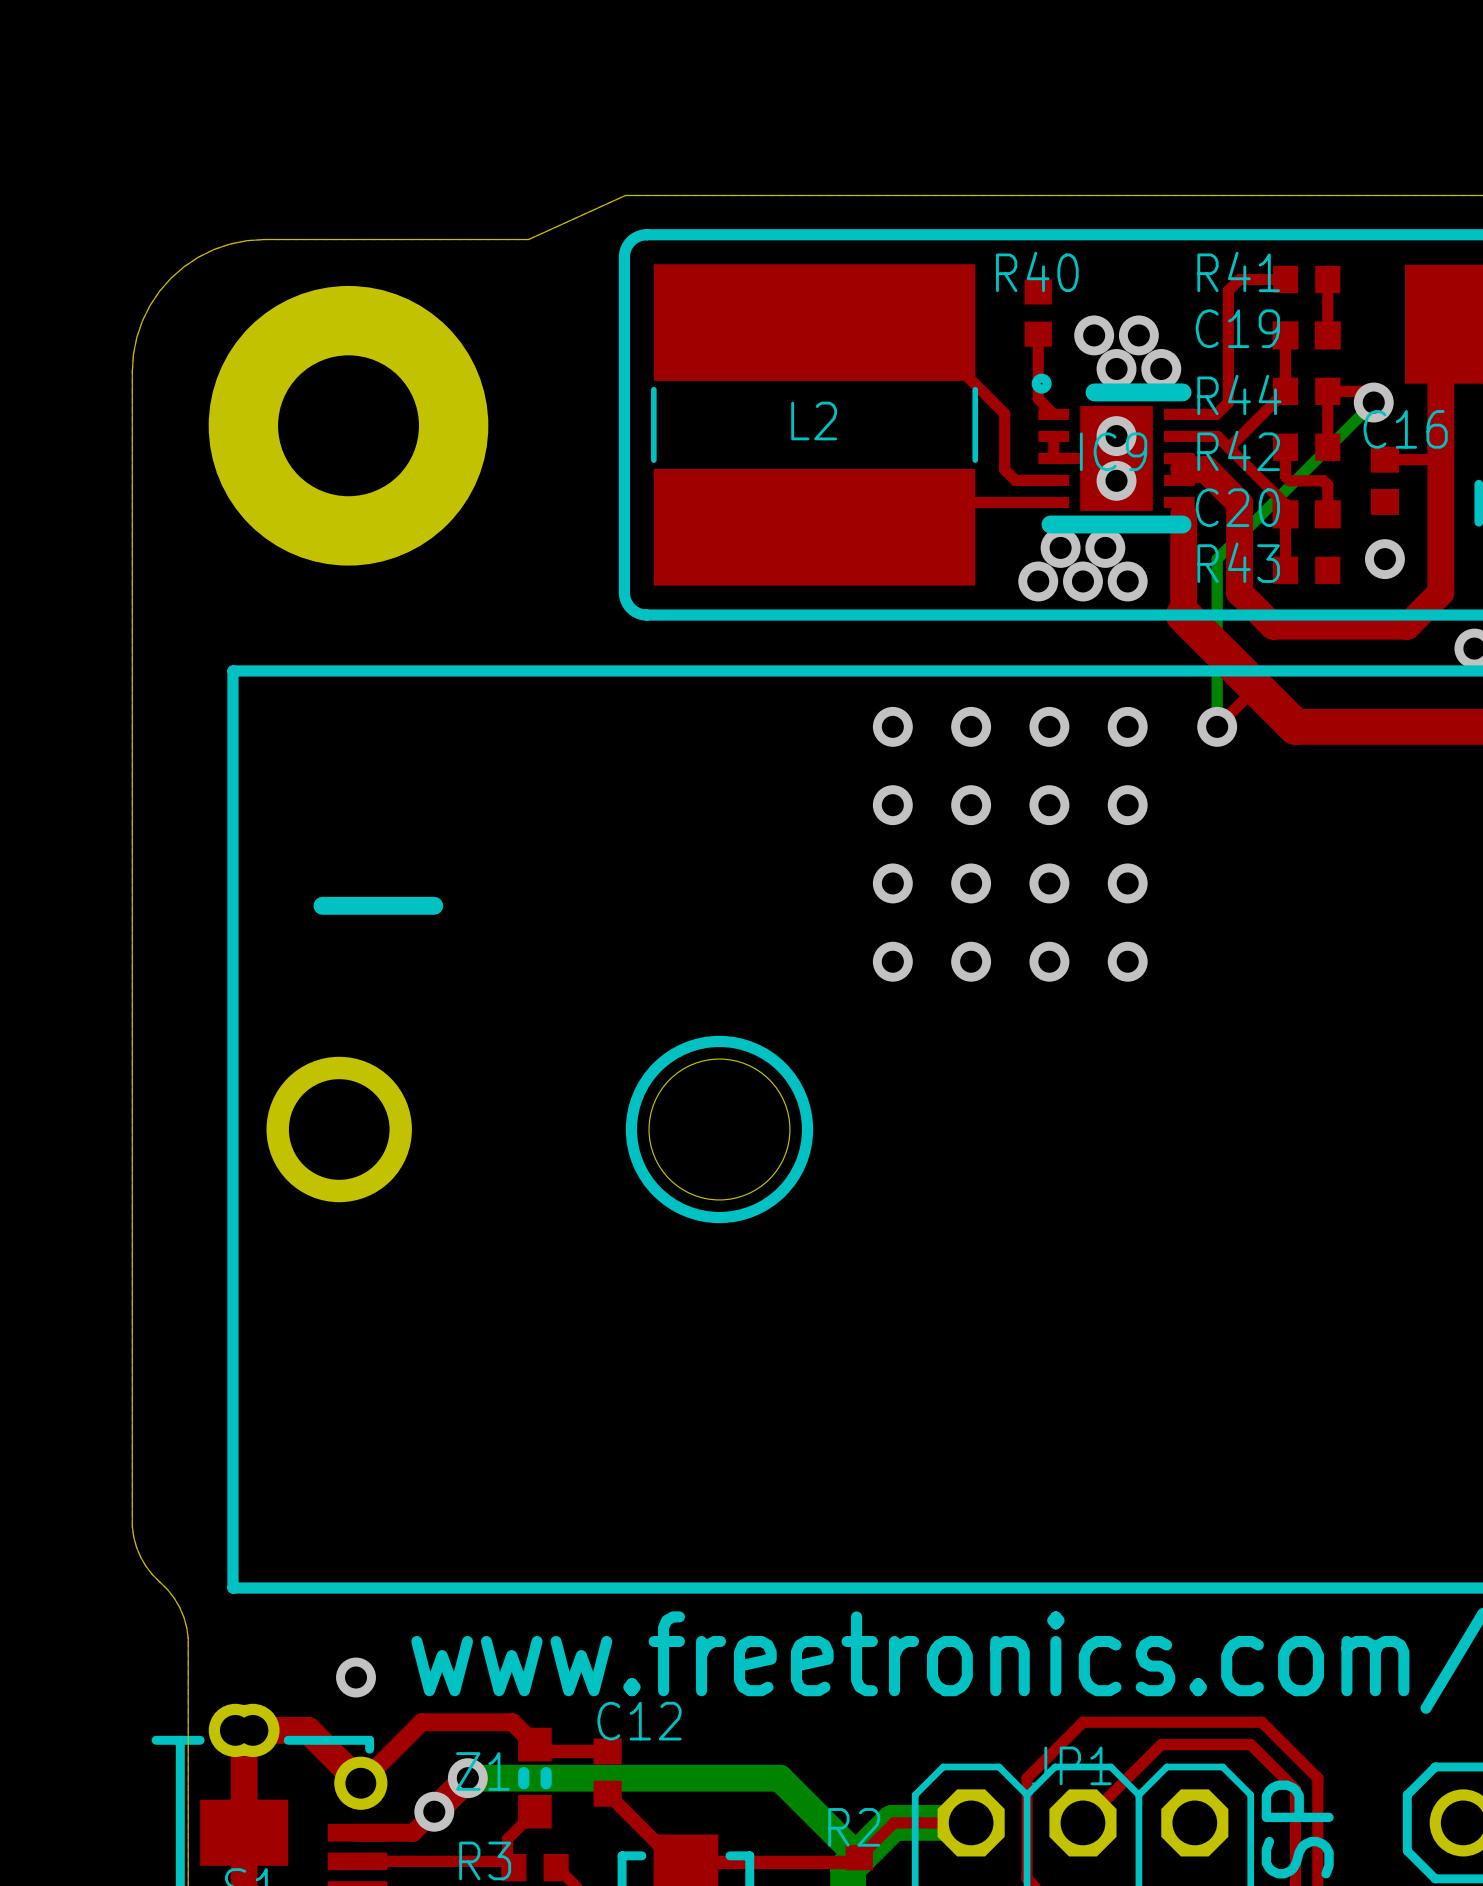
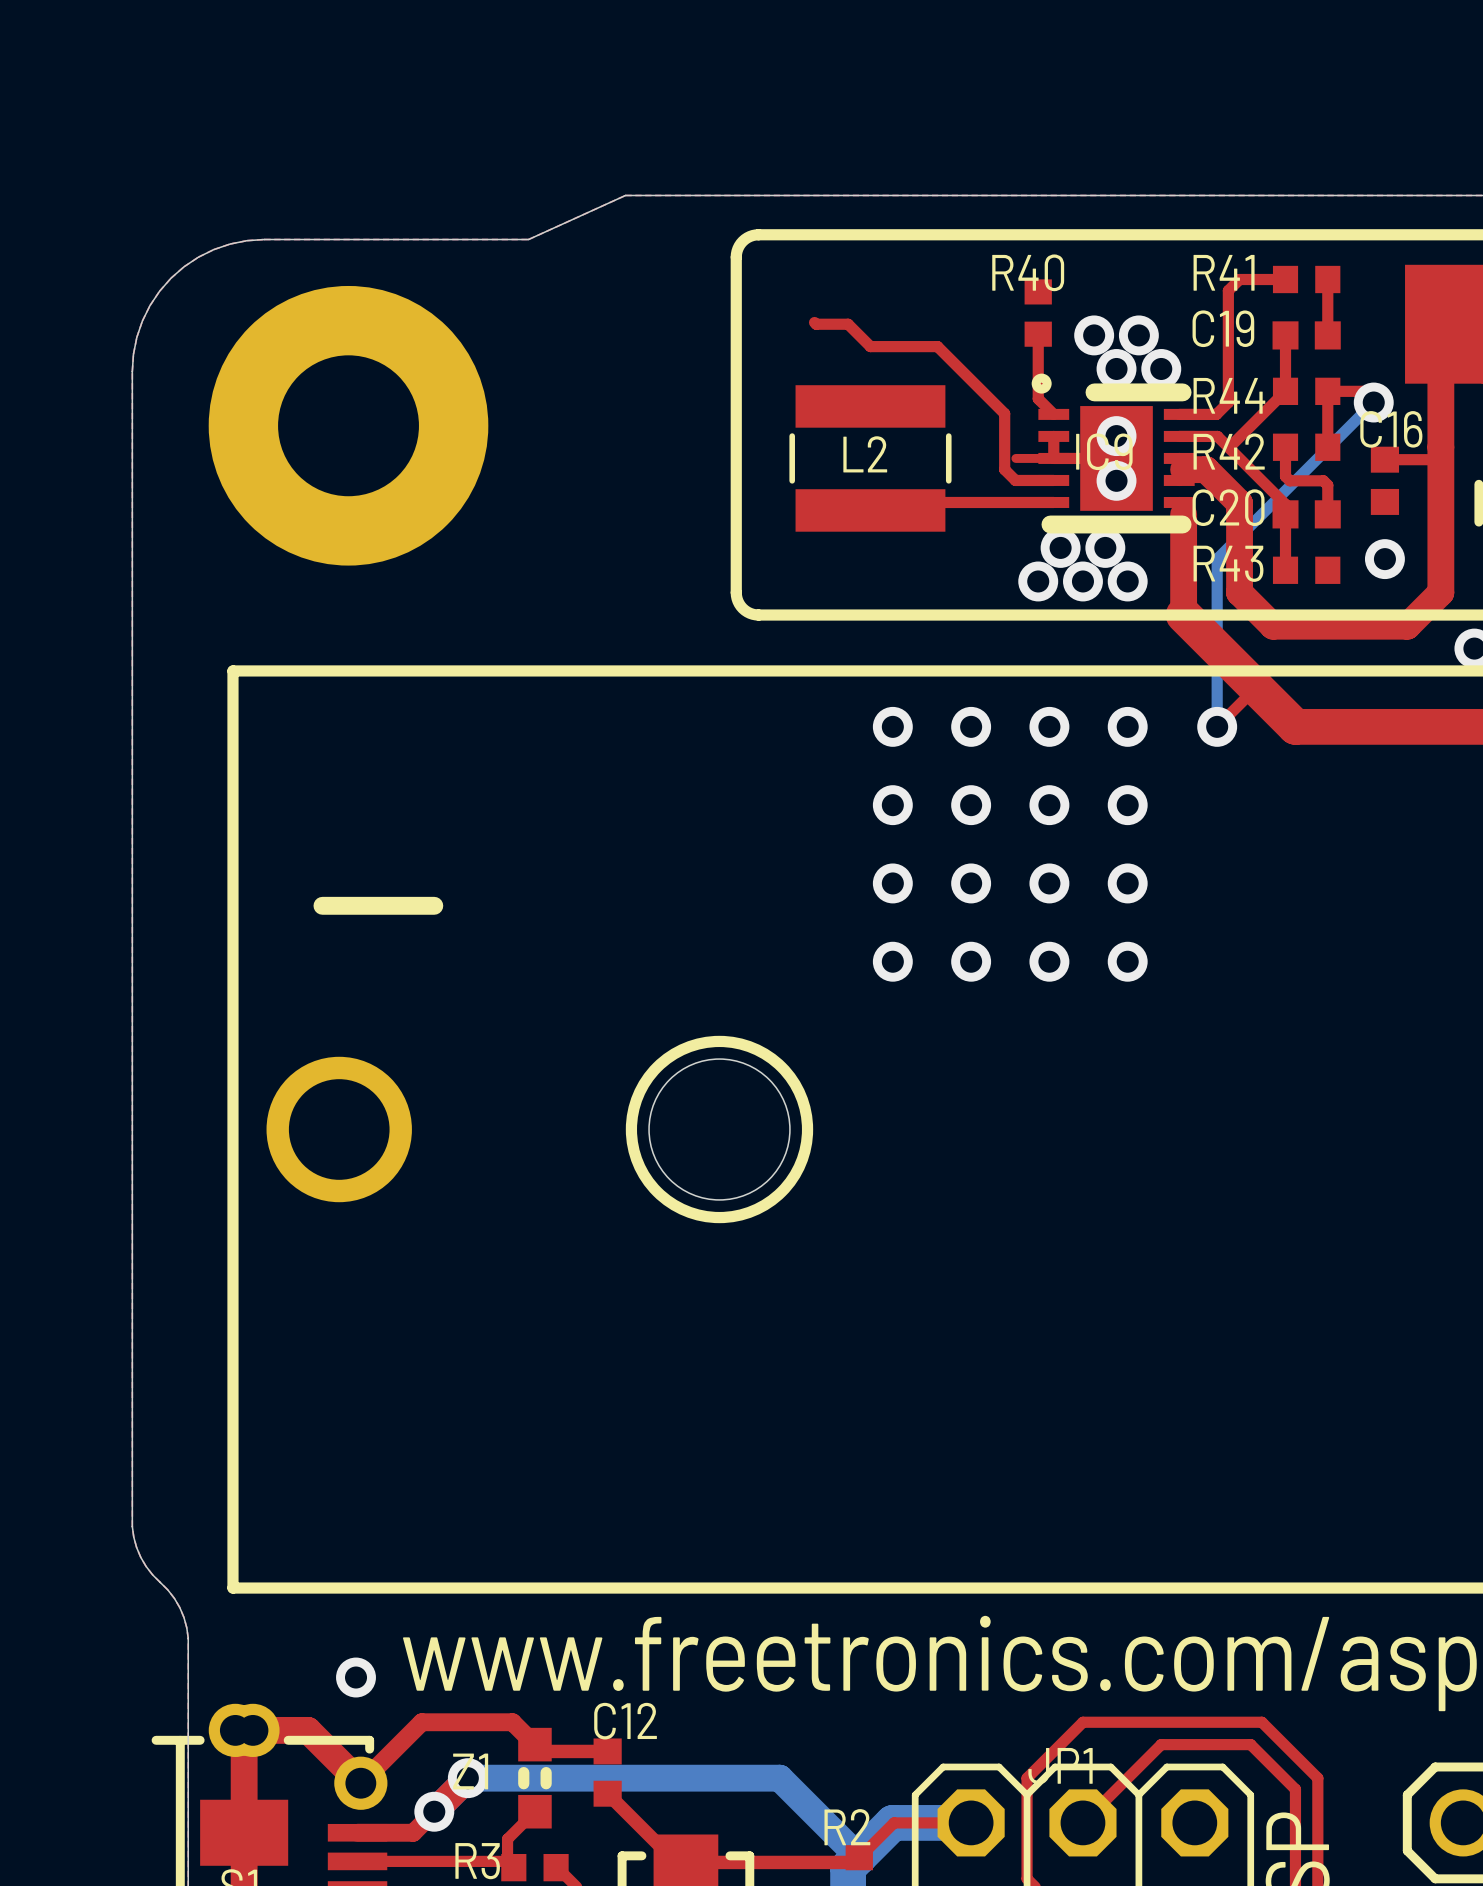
line: (758, 234) (643, 234) (635, 237) (629, 243) (624, 257) (624, 592) (626, 601) (633, 610) (643, 614) (758, 615) -> (758, 234) (750, 236) (742, 241) (737, 248) (736, 257) (736, 592) (737, 601) (742, 608) (750, 613) (758, 615)
L2 footprint: [651, 264, 979, 586] -> [789, 385, 952, 532]
top track: none -> (1015, 458) (1053, 458)

